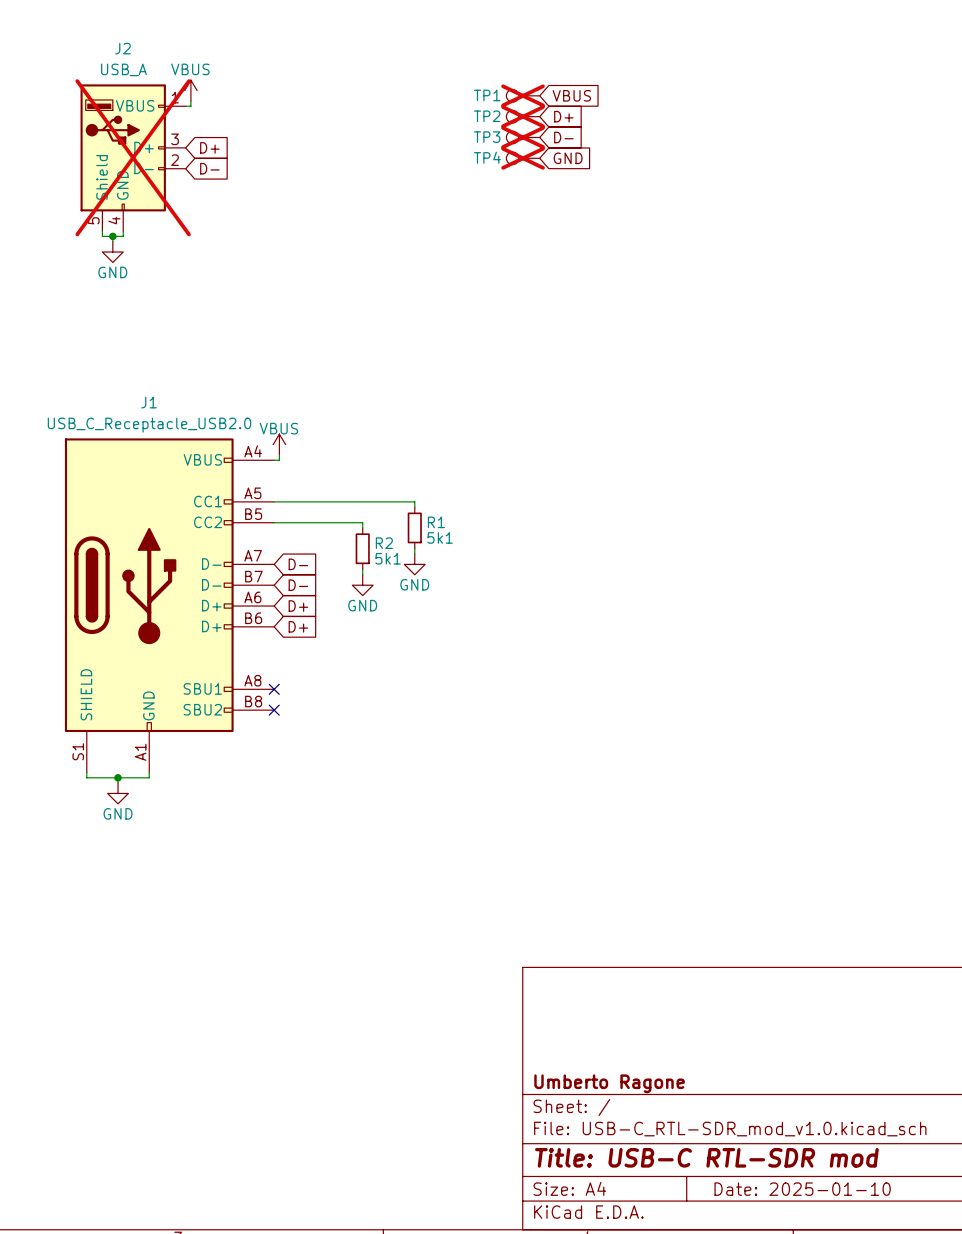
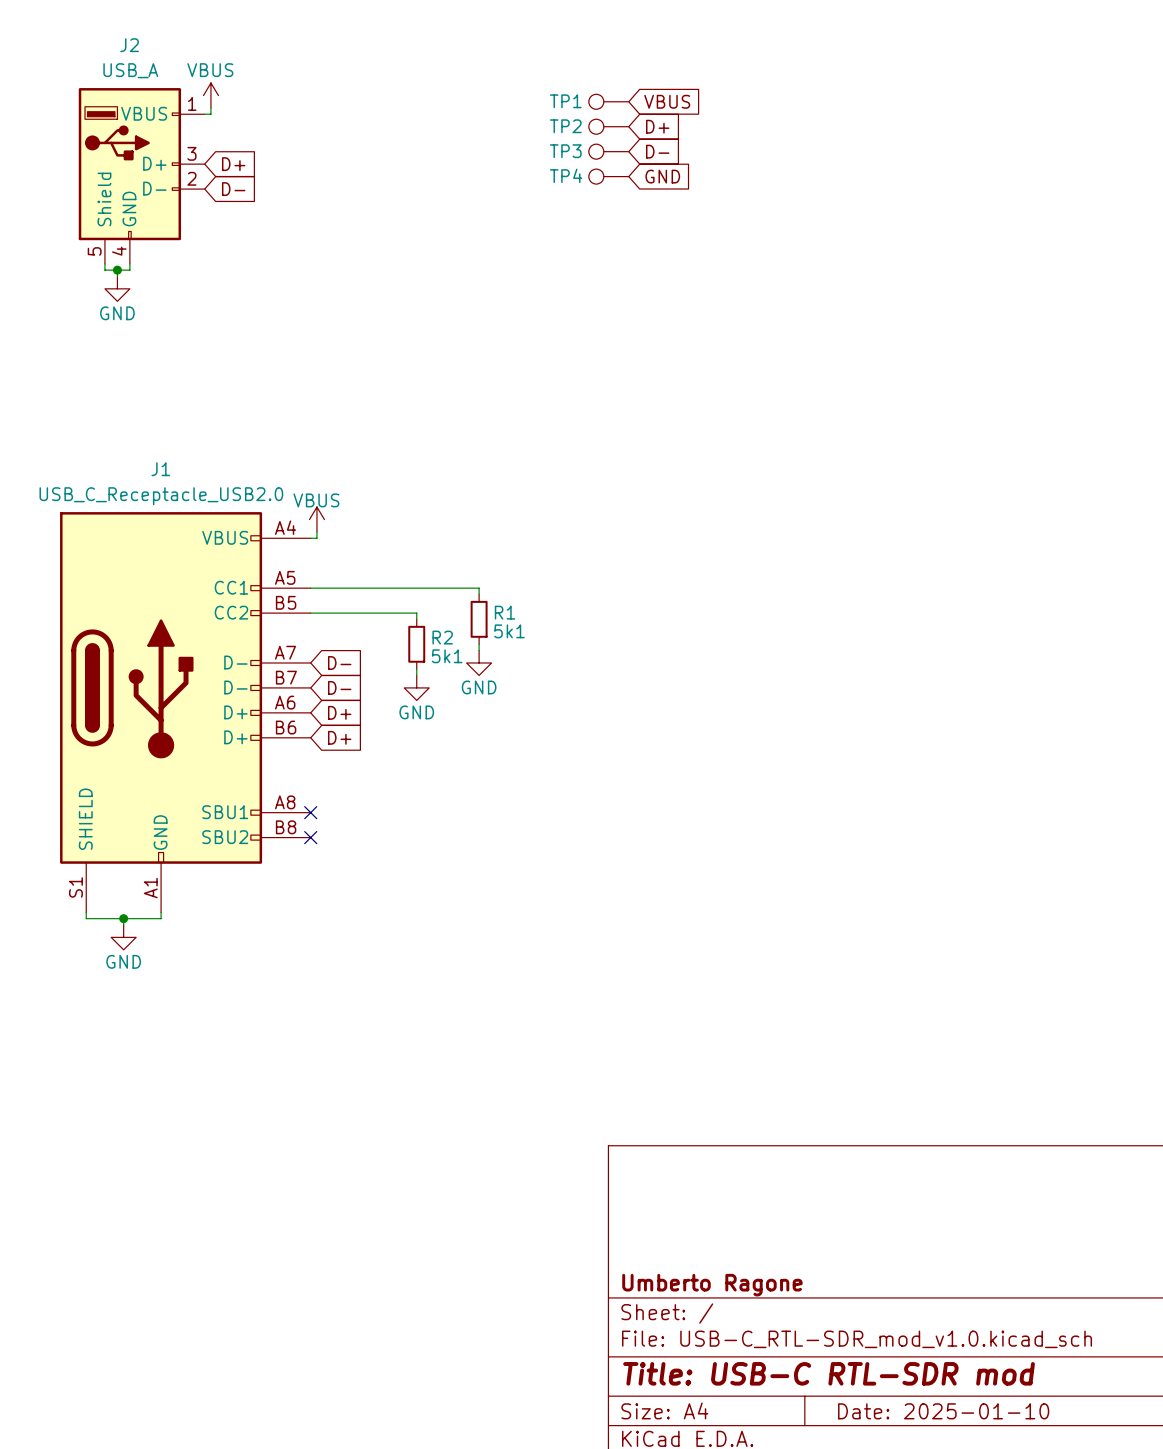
TP1 do-not-place cross: (523, 95) -> none
TP2 do-not-place cross: (523, 116) -> none
TP3 do-not-place cross: (523, 137) -> none
J2 do-not-place cross: (133, 157) -> none
TP4 do-not-place cross: (523, 158) -> none

